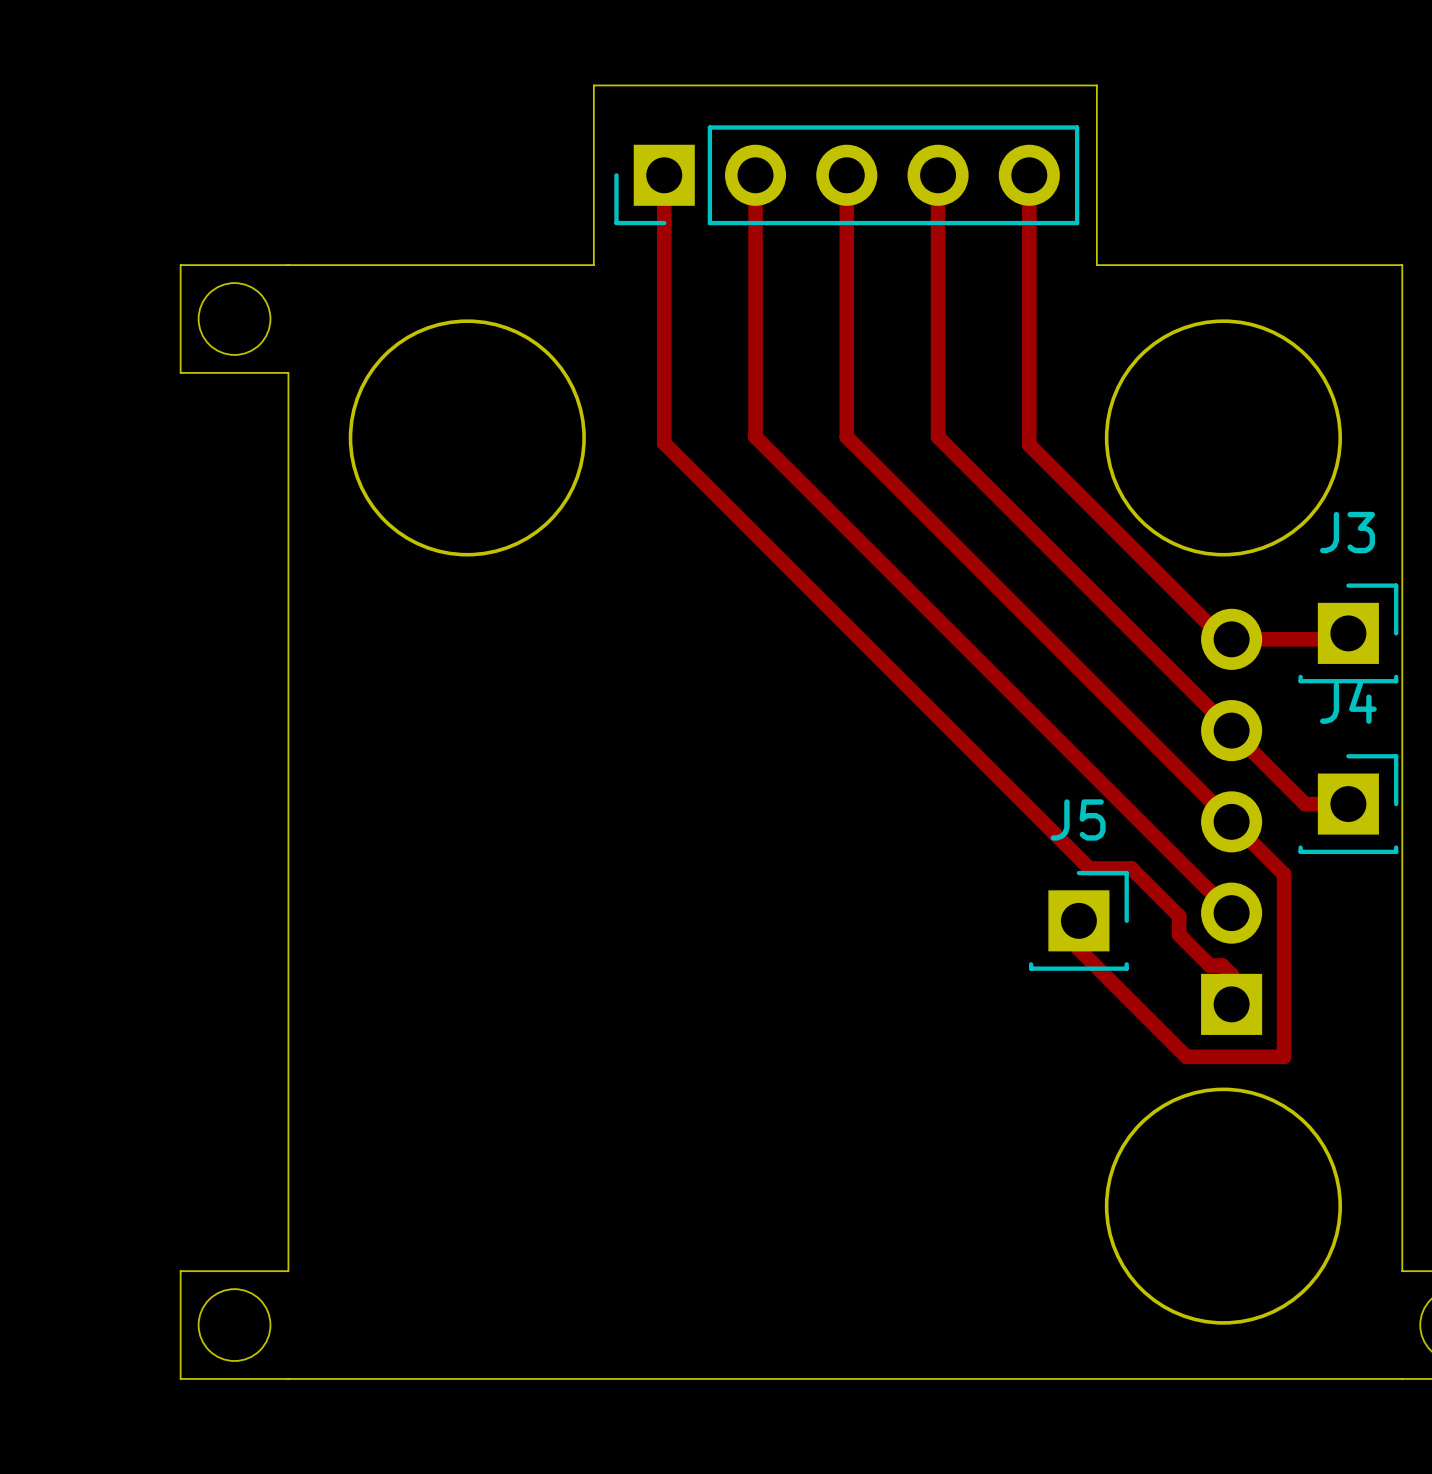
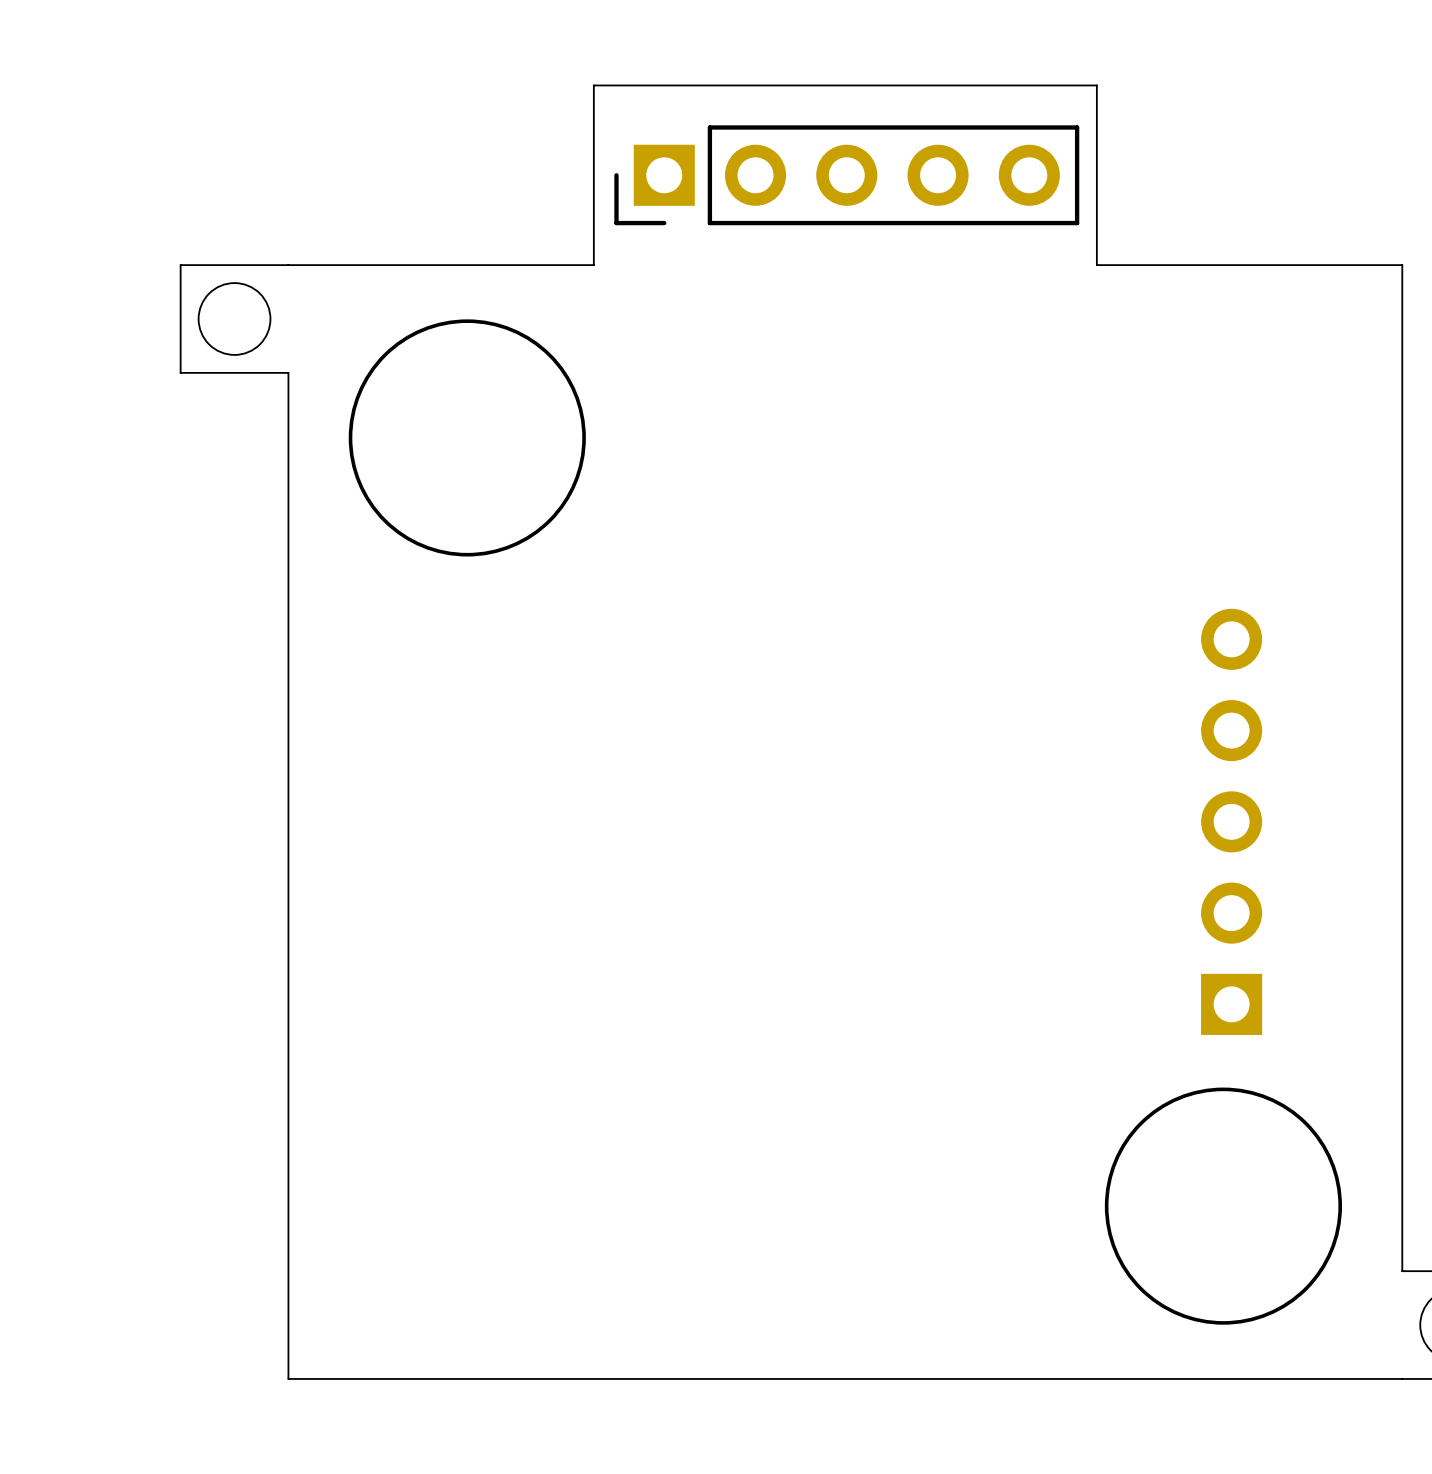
track: (664, 175) (664, 443) (1089, 868) (1131, 868) (1179, 916) (1179, 934) (1209, 965) (1222, 965) (1231, 974) (1231, 1004) -> none
track: (755, 175) (755, 437) (1231, 913) -> none
track: (846, 175) (846, 437) (1284, 874) (1284, 1056) (1186, 1056) (1078, 949) (1078, 920) -> none
track: (938, 175) (938, 437) (1305, 804) (1348, 804) -> none
track: (1029, 175) (1029, 444) (1223, 639) (1342, 639) (1348, 633) -> none
round board edge: [1104, 319, 1342, 557] -> none
J3: (1348, 633) -> none
J4: (1348, 804) -> none
J5: (1078, 920) -> none
board edge: (288, 1271) (180, 1271) (180, 1378) (288, 1378) -> (288, 1271) (288, 1378)
round board edge: [197, 1288, 272, 1362] -> none

